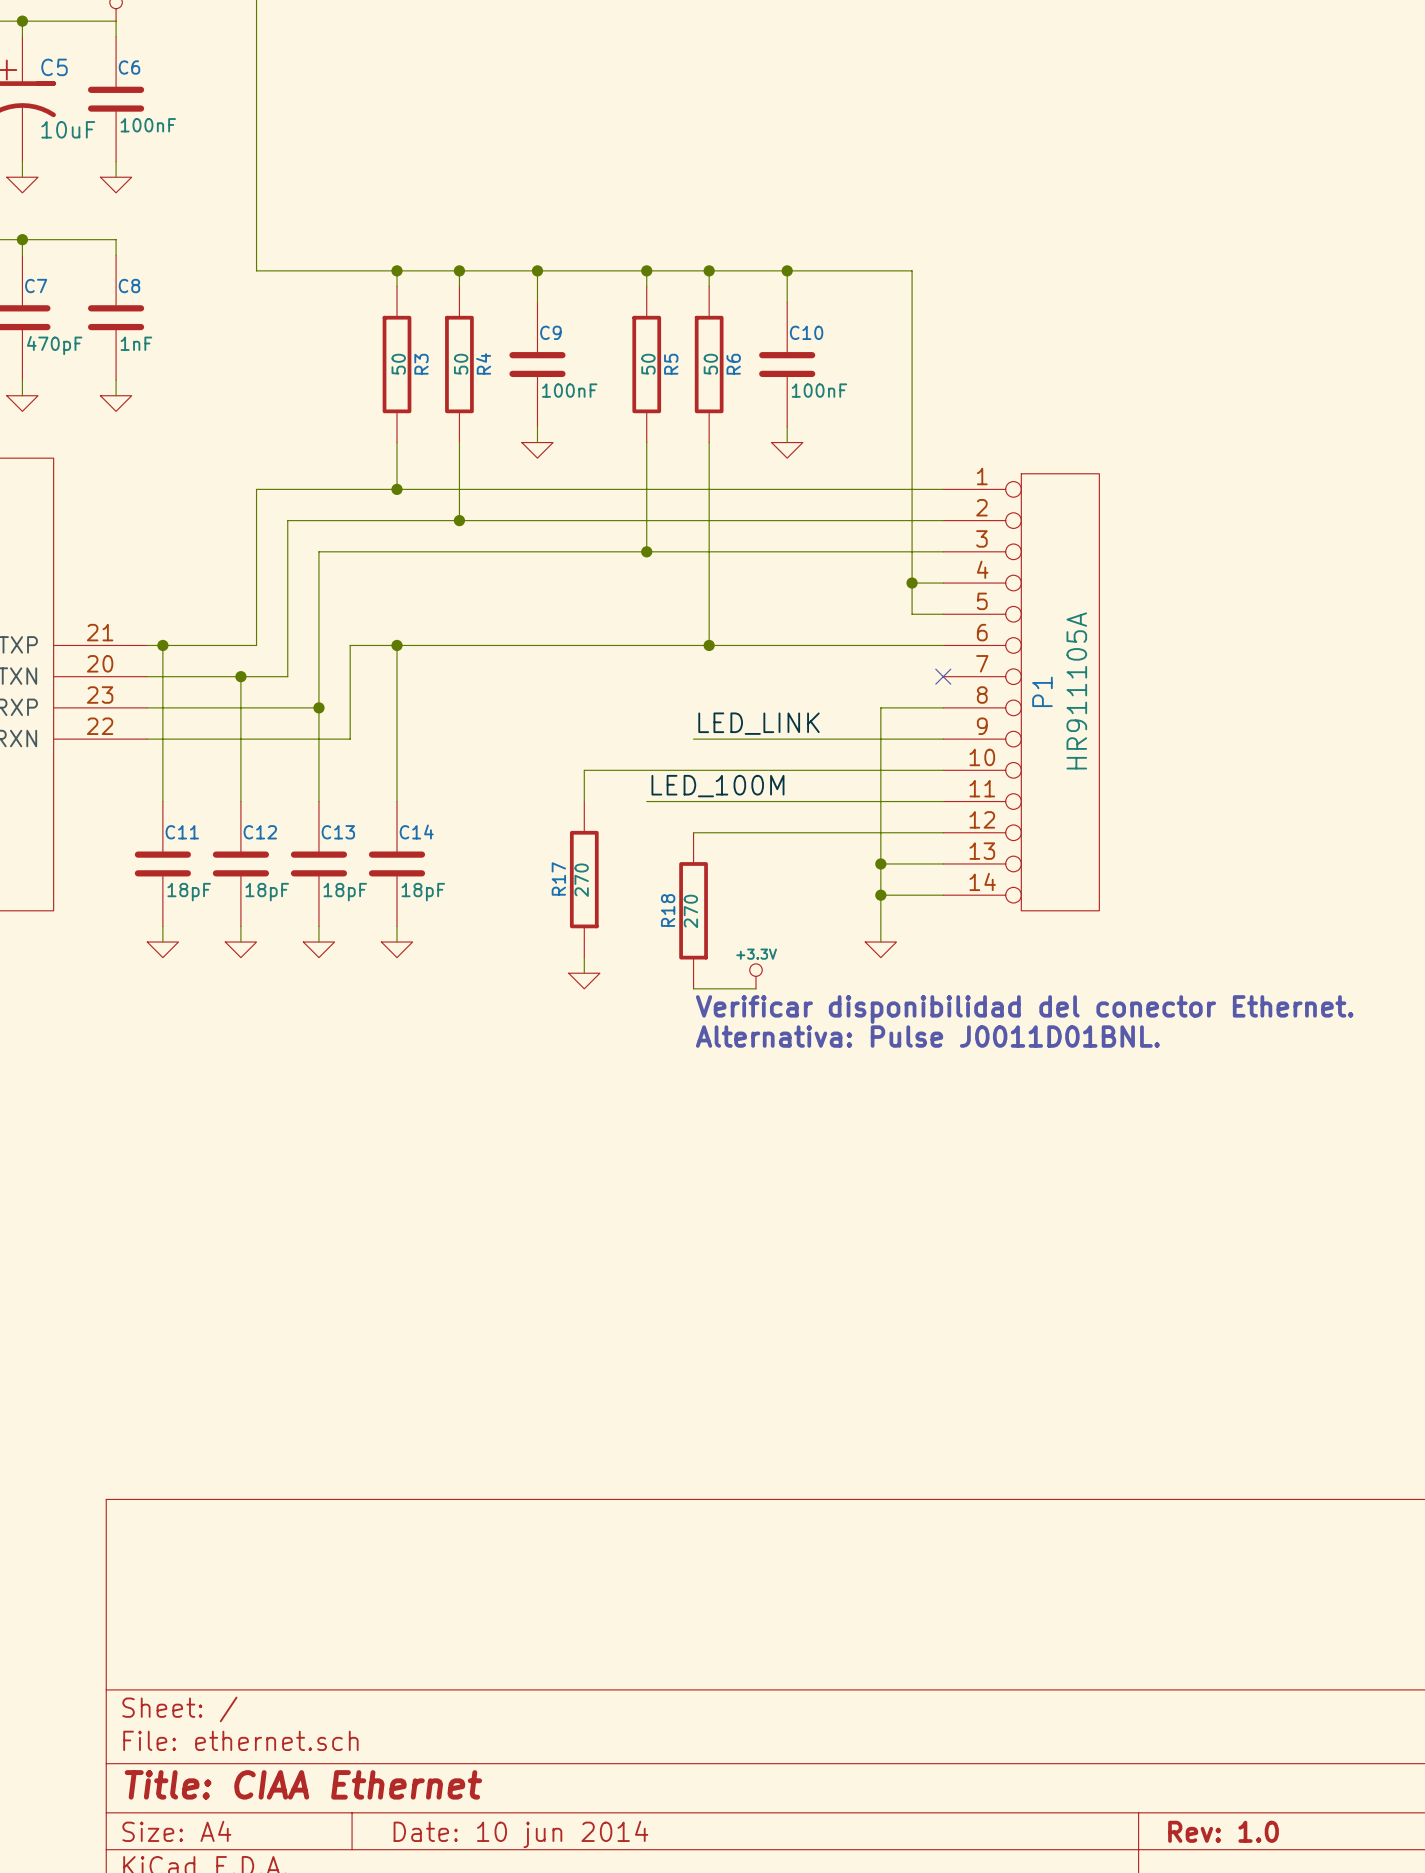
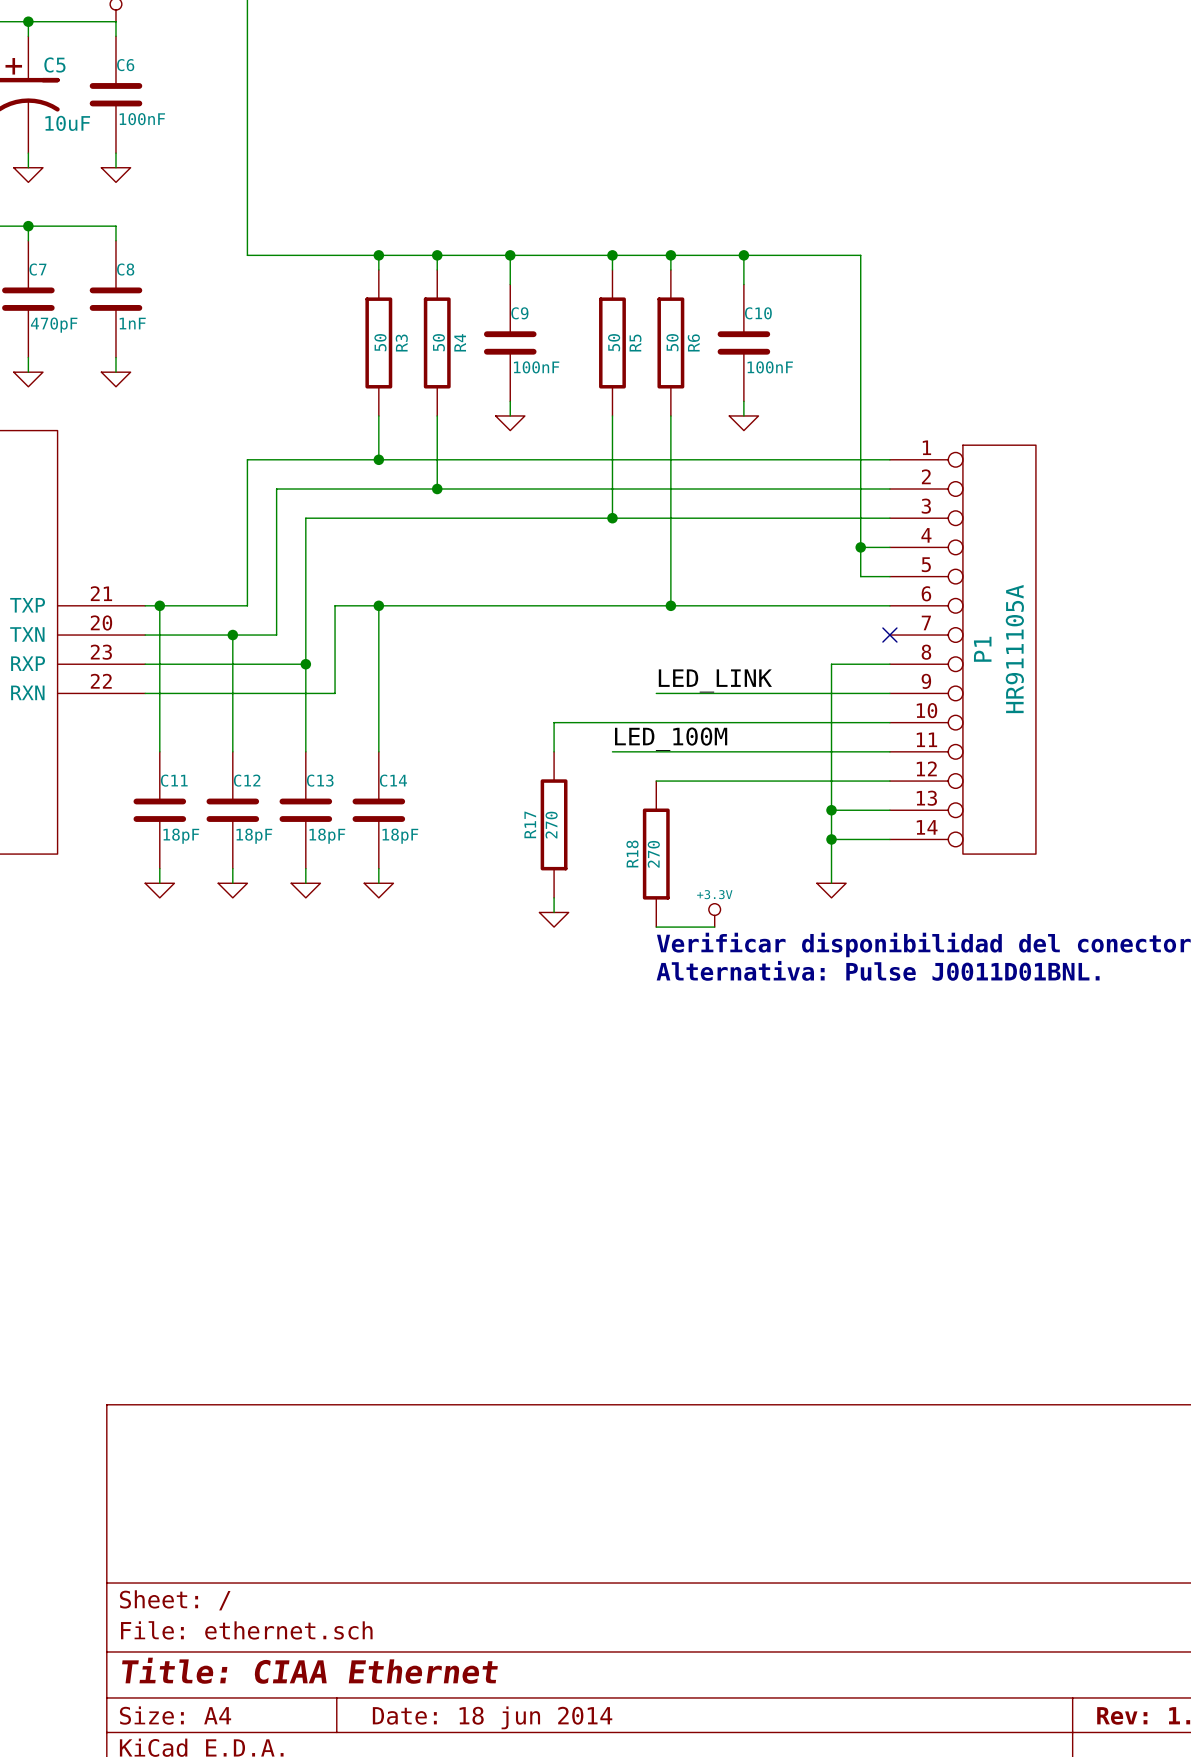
title block: Date: 10 jun 2014 (520, 1834) -> Date: 18 jun 2014 (492, 1717)

